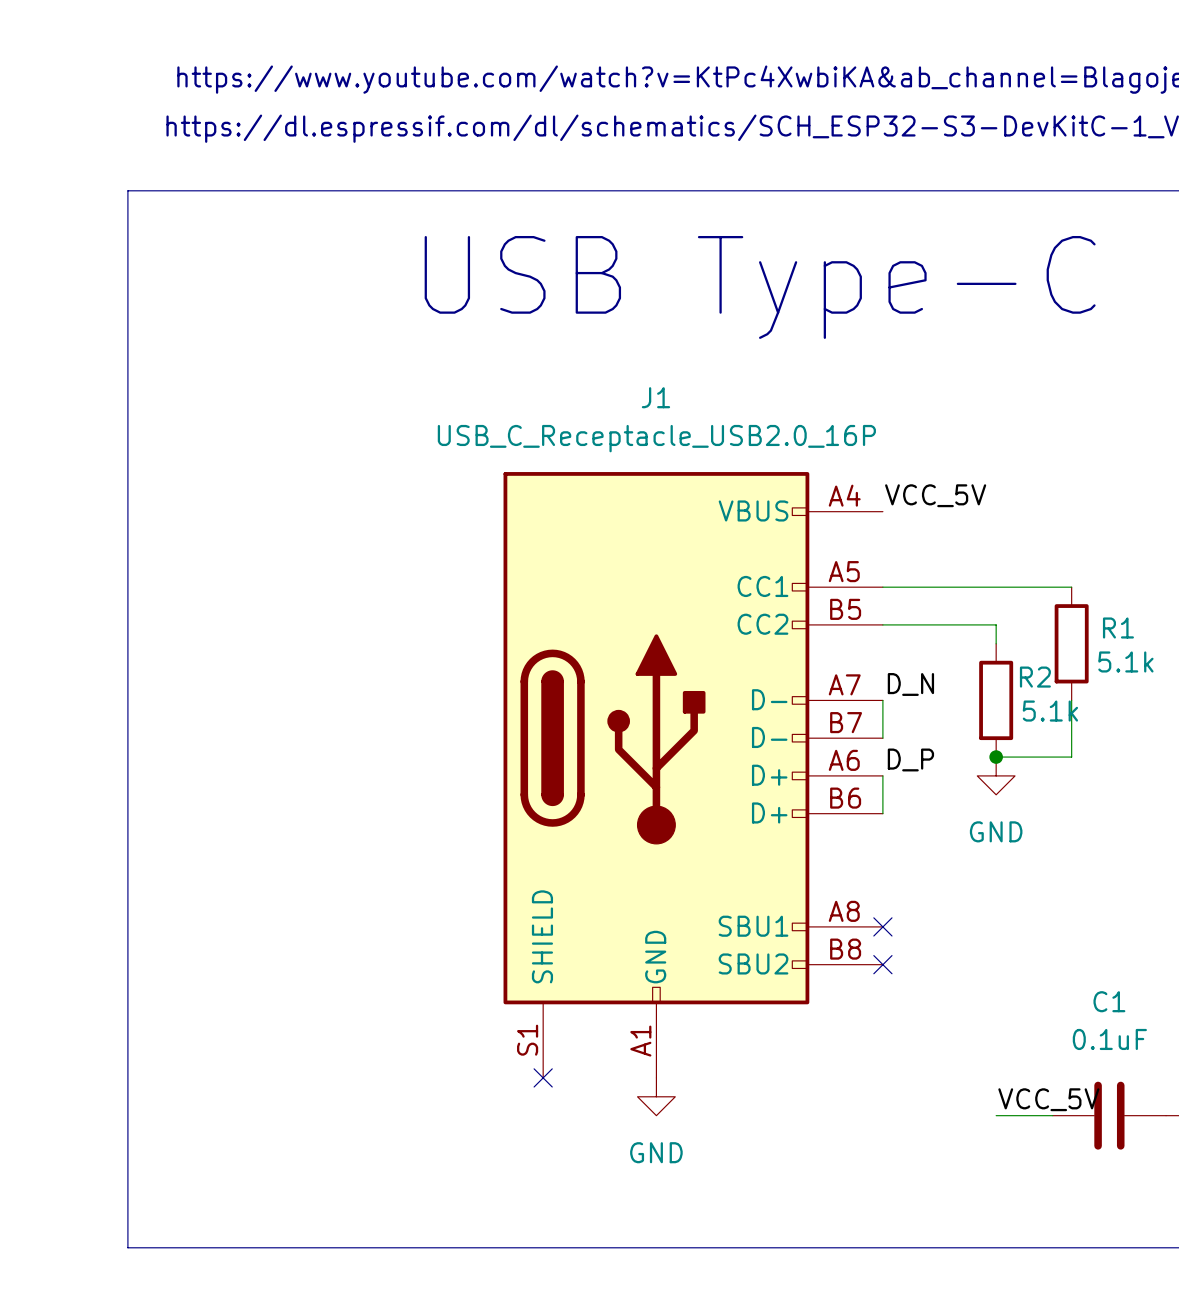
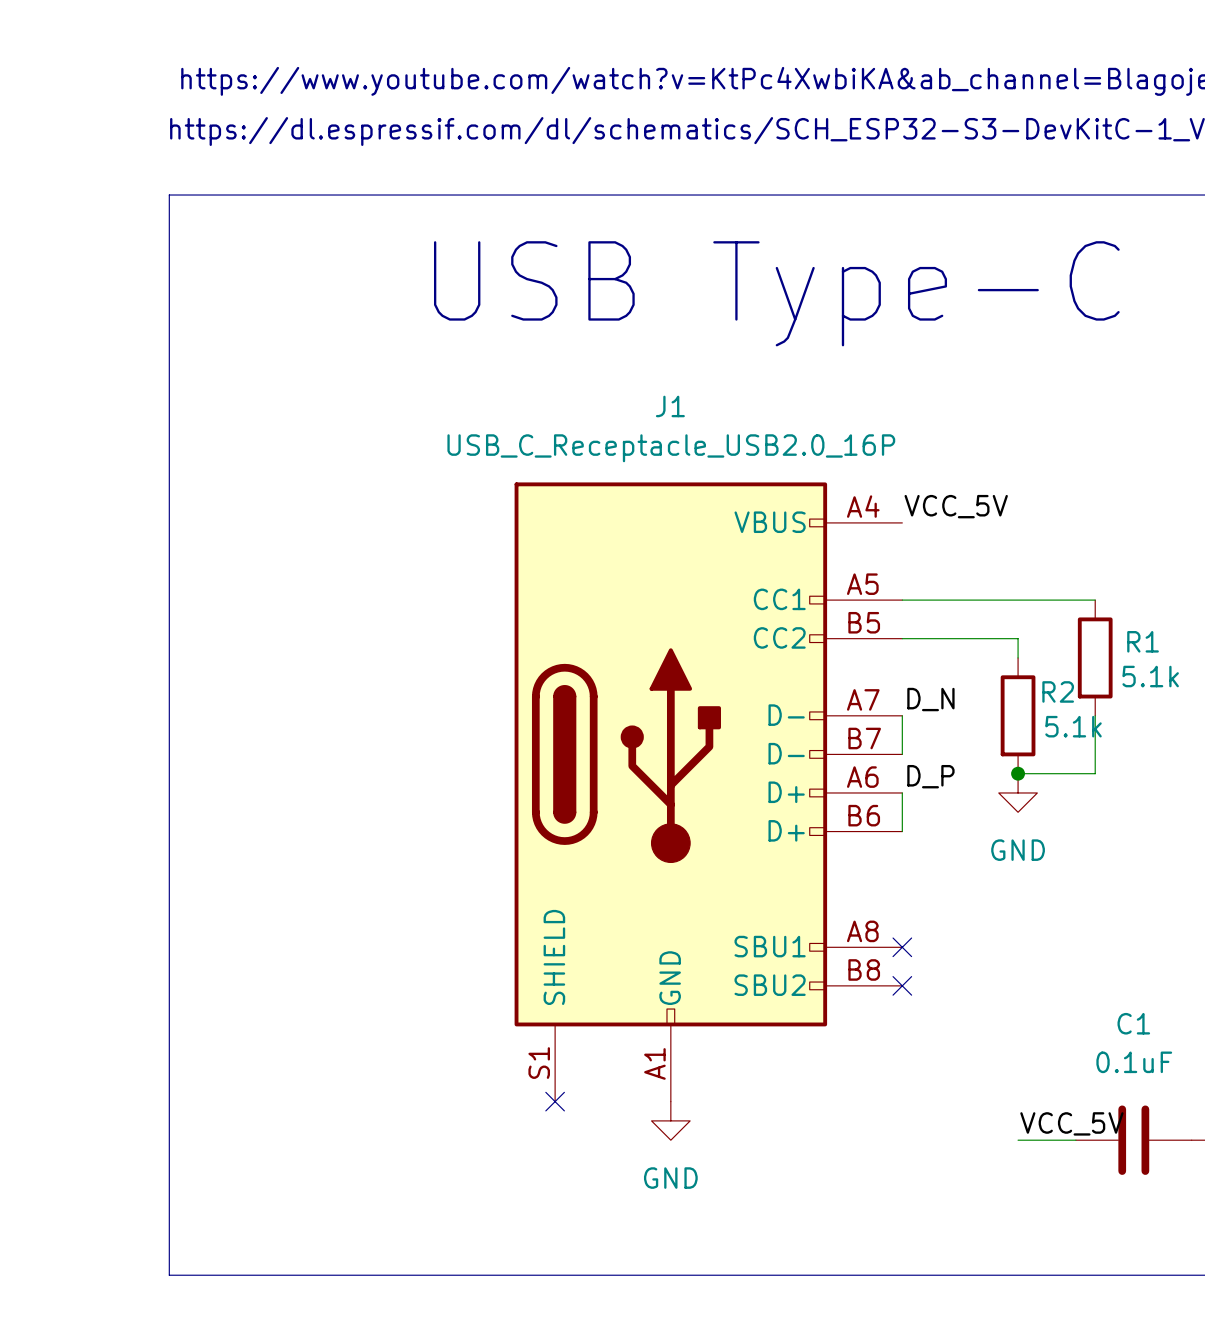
line: (165, 190) (127, 190) (127, 1247) (165, 1247) -> (169, 195) (169, 1275)

